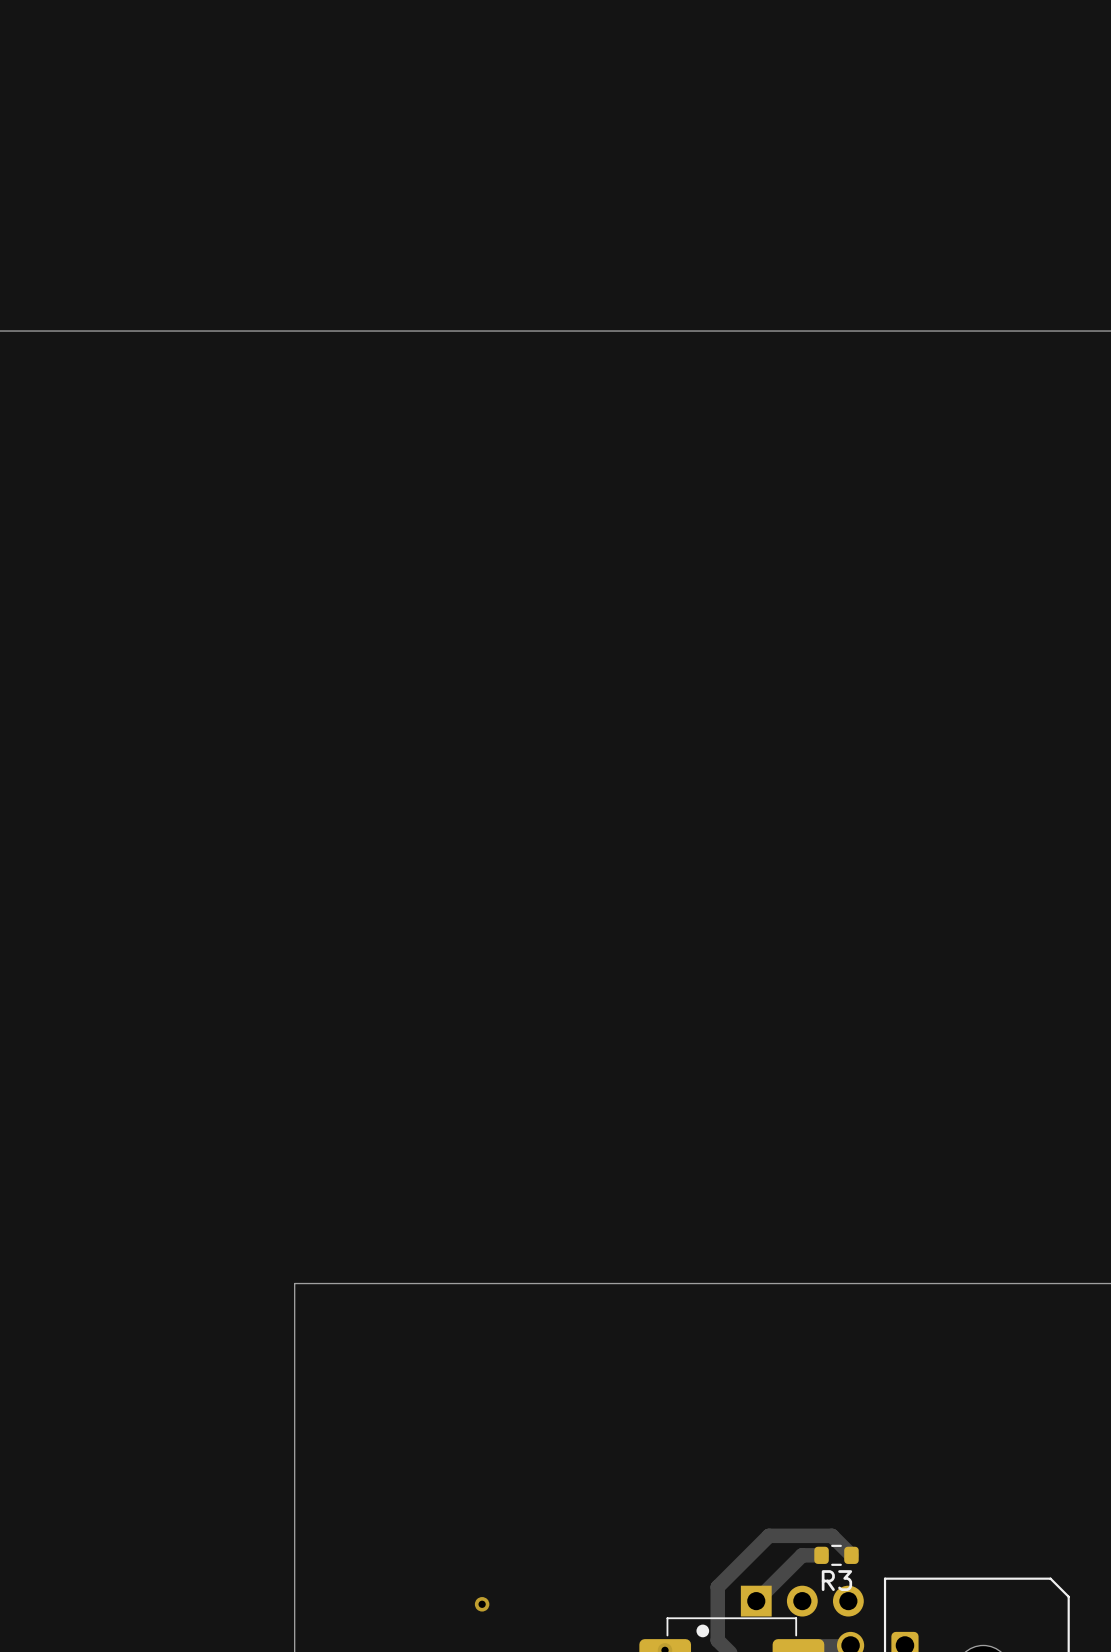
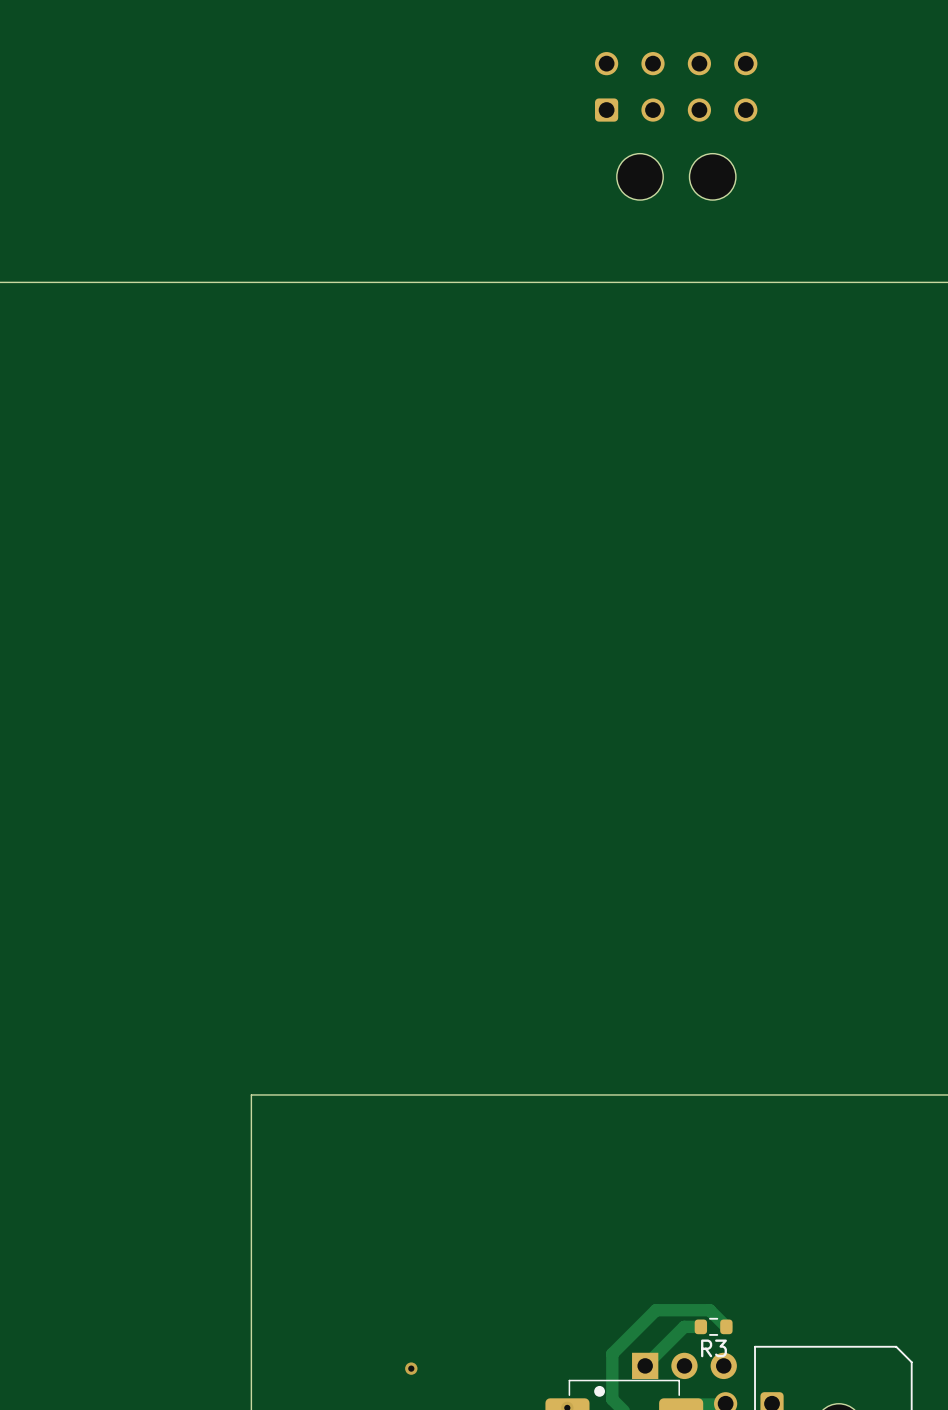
part: none -> (676, 126)

